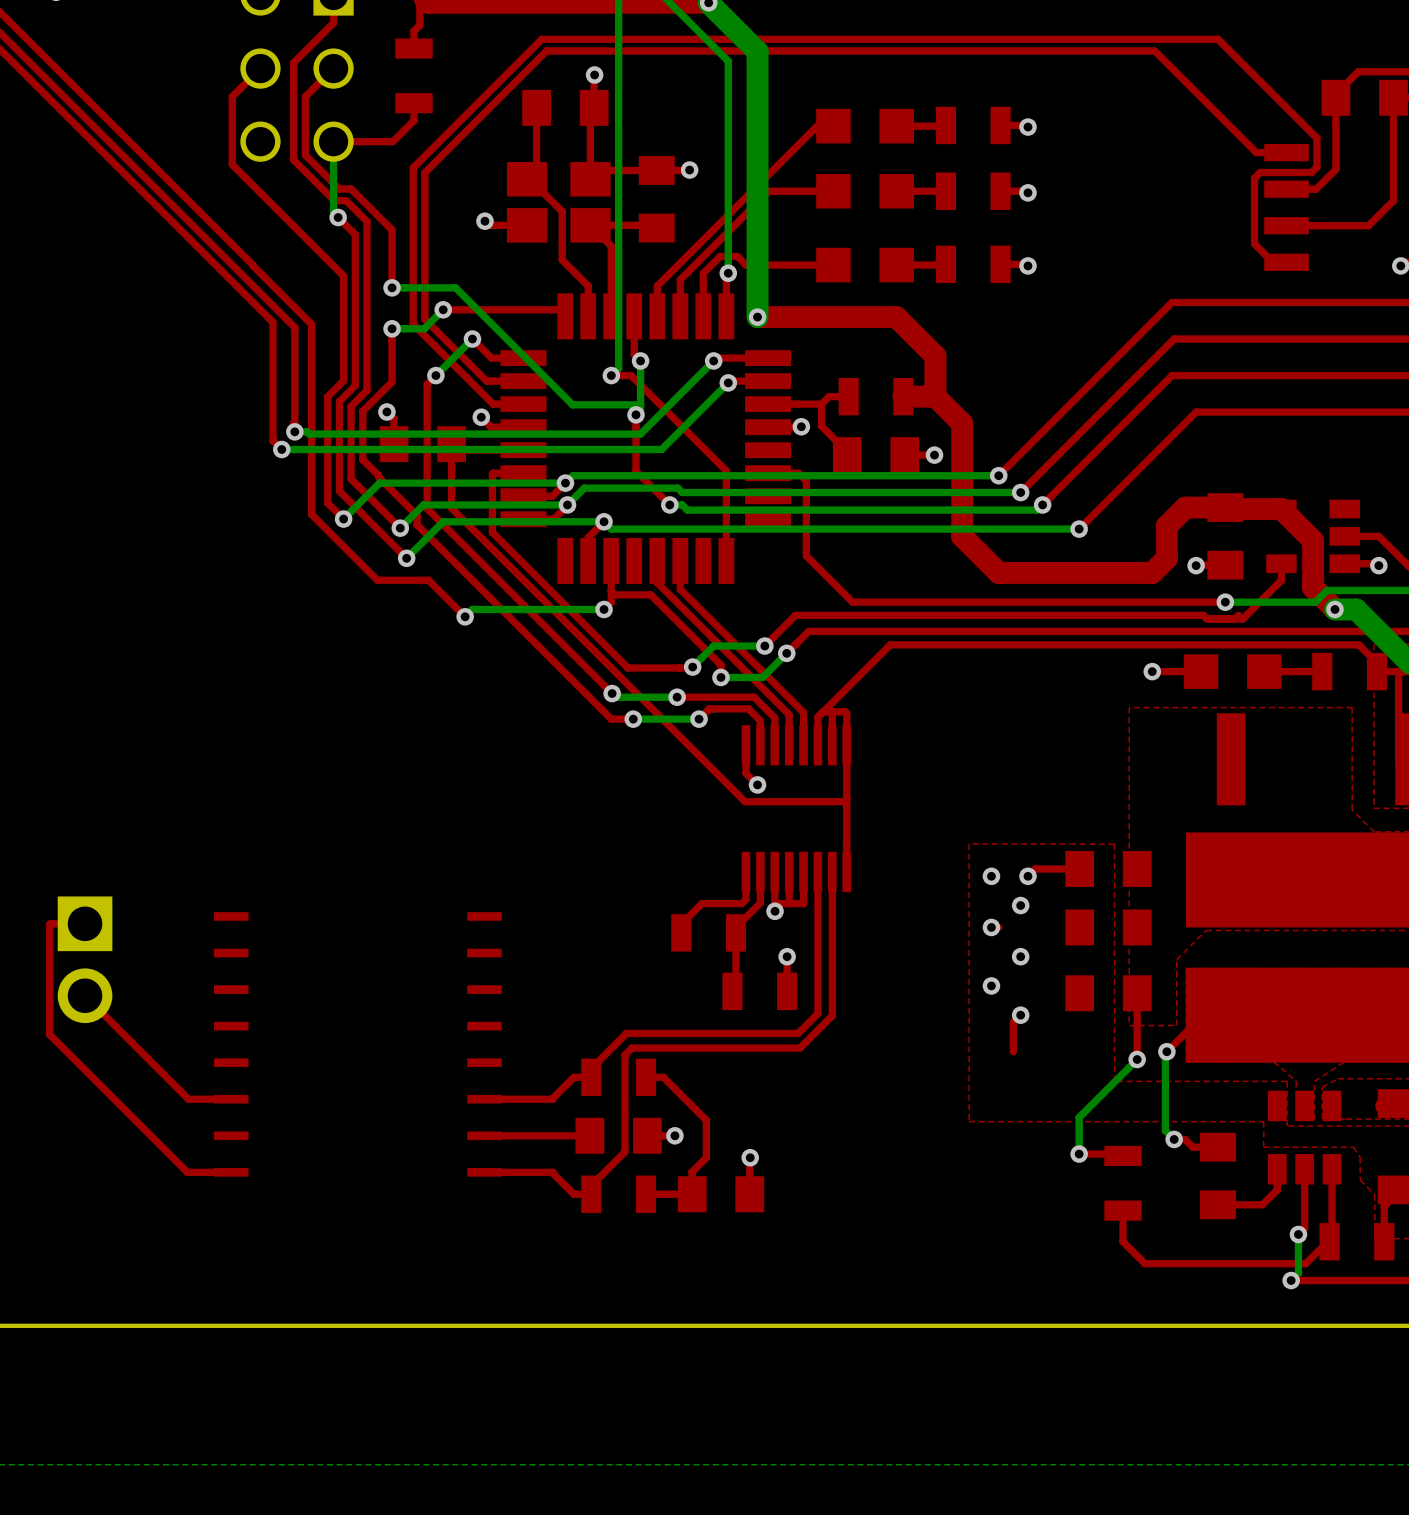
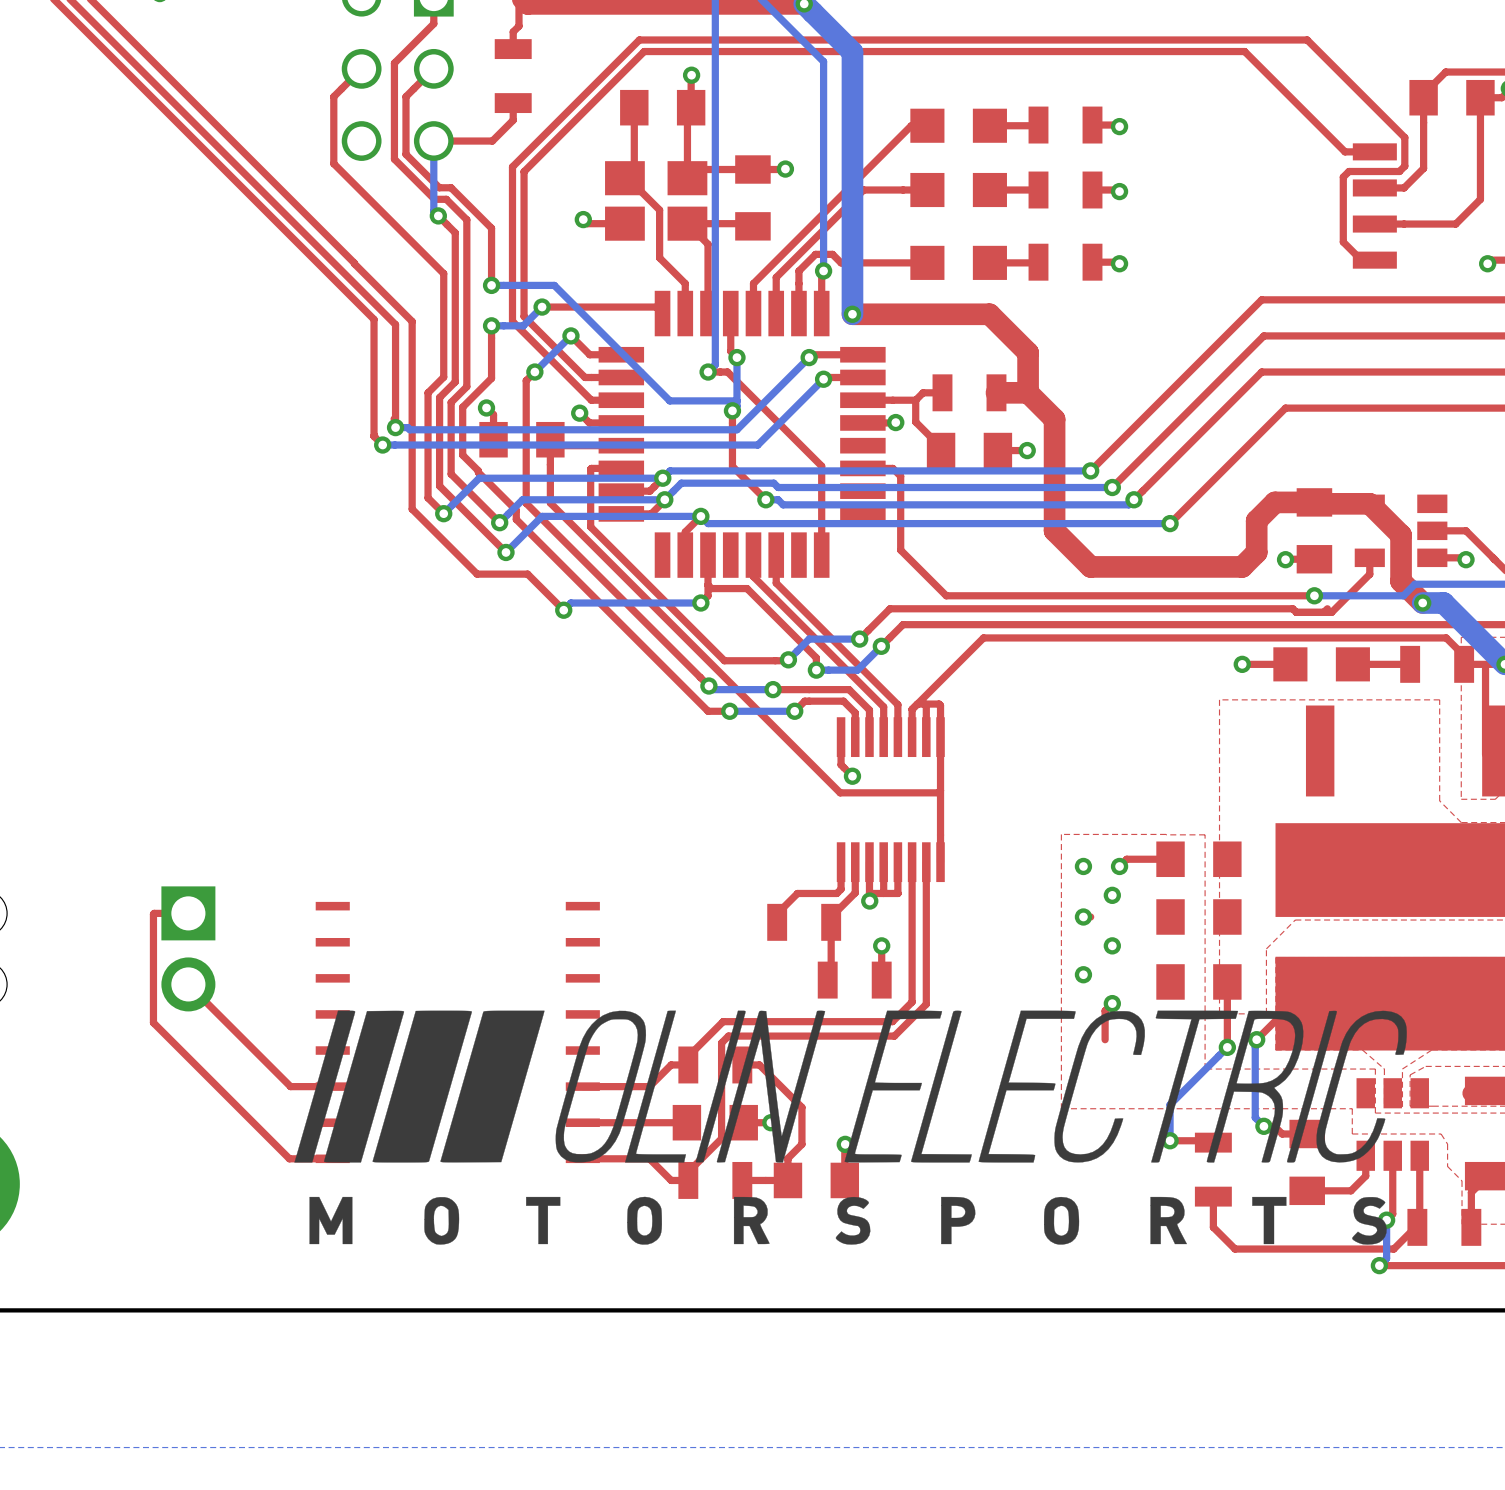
drawing: none -> [294, 1010, 1407, 1245]

